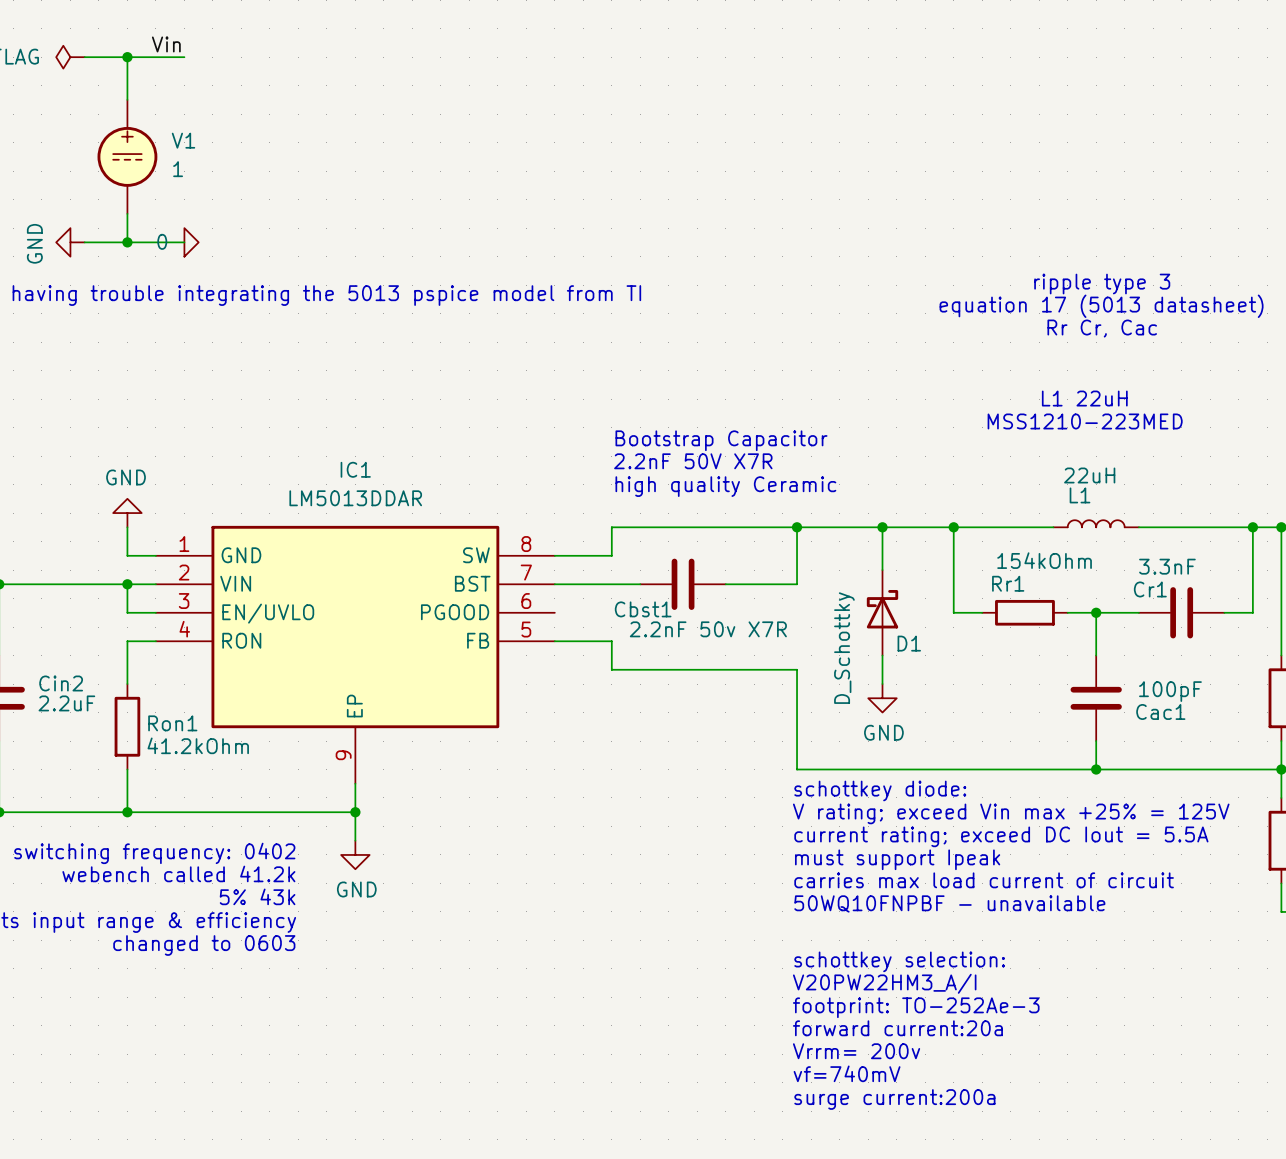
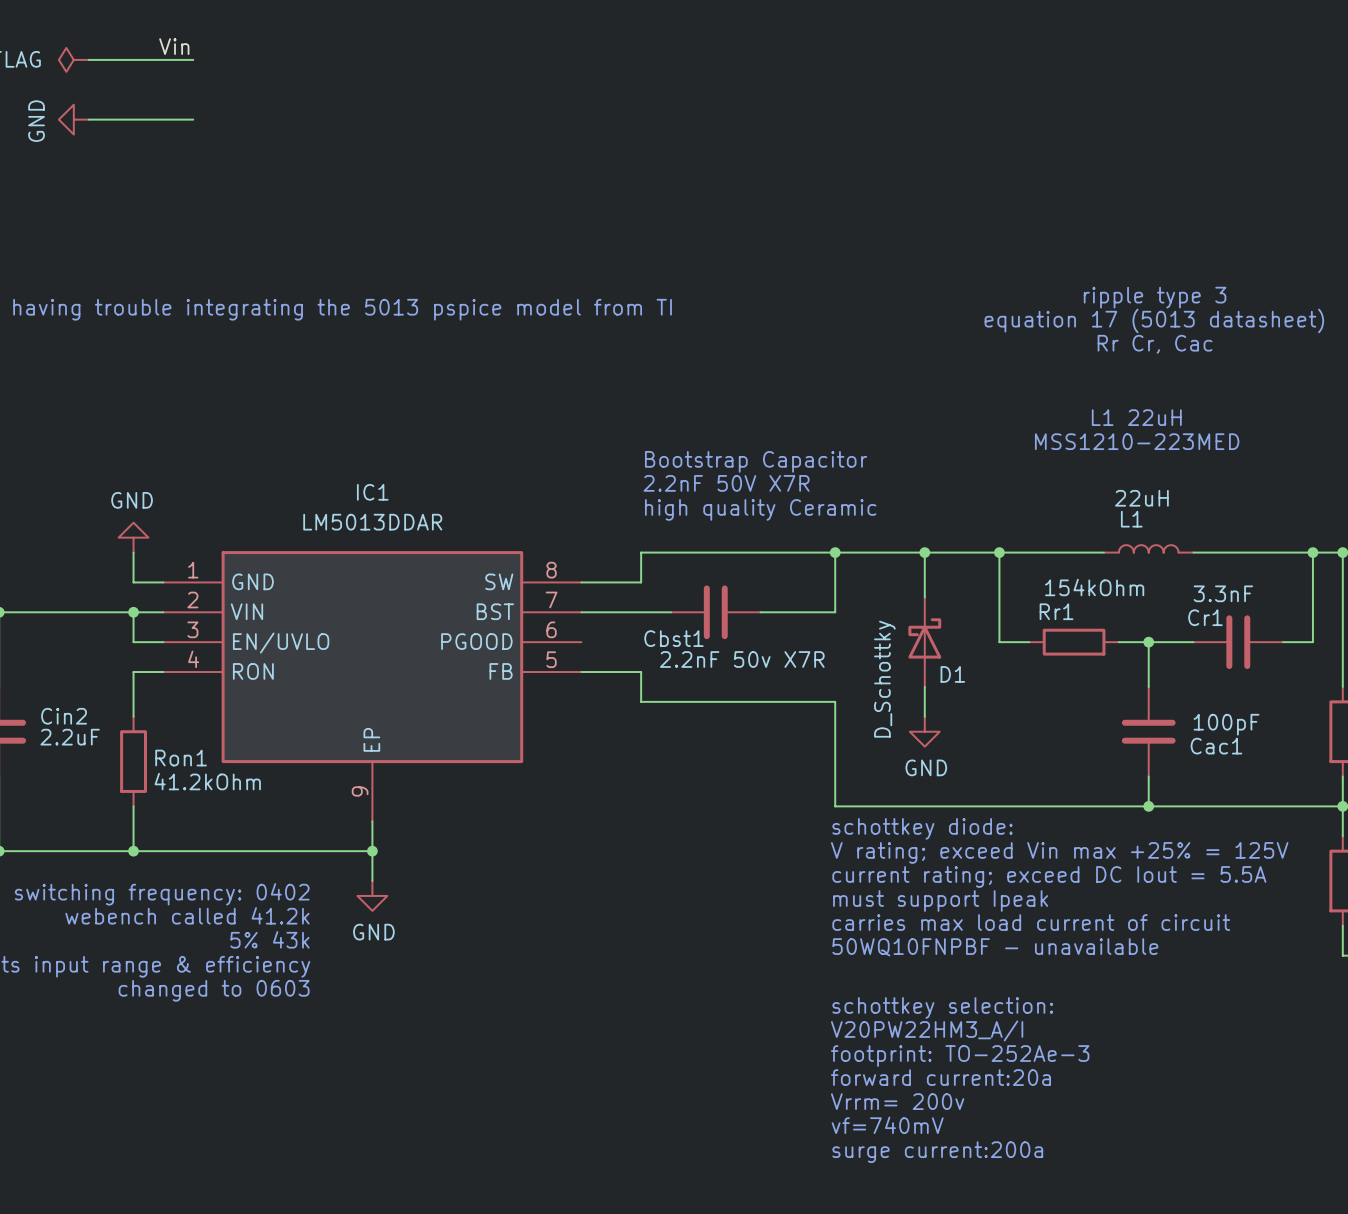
wire: (127, 57) (127, 99) -> none
junction: (127, 57) -> none
V1: 1 (127, 156) -> none
wire: (127, 213) (127, 242) -> none
power symbol position: GND (70, 242) -> GND (73, 119)
wire: (84, 242) (184, 242) -> (88, 119) (193, 119)
junction: (127, 242) -> none
power symbol: 0 (191, 242) -> none

